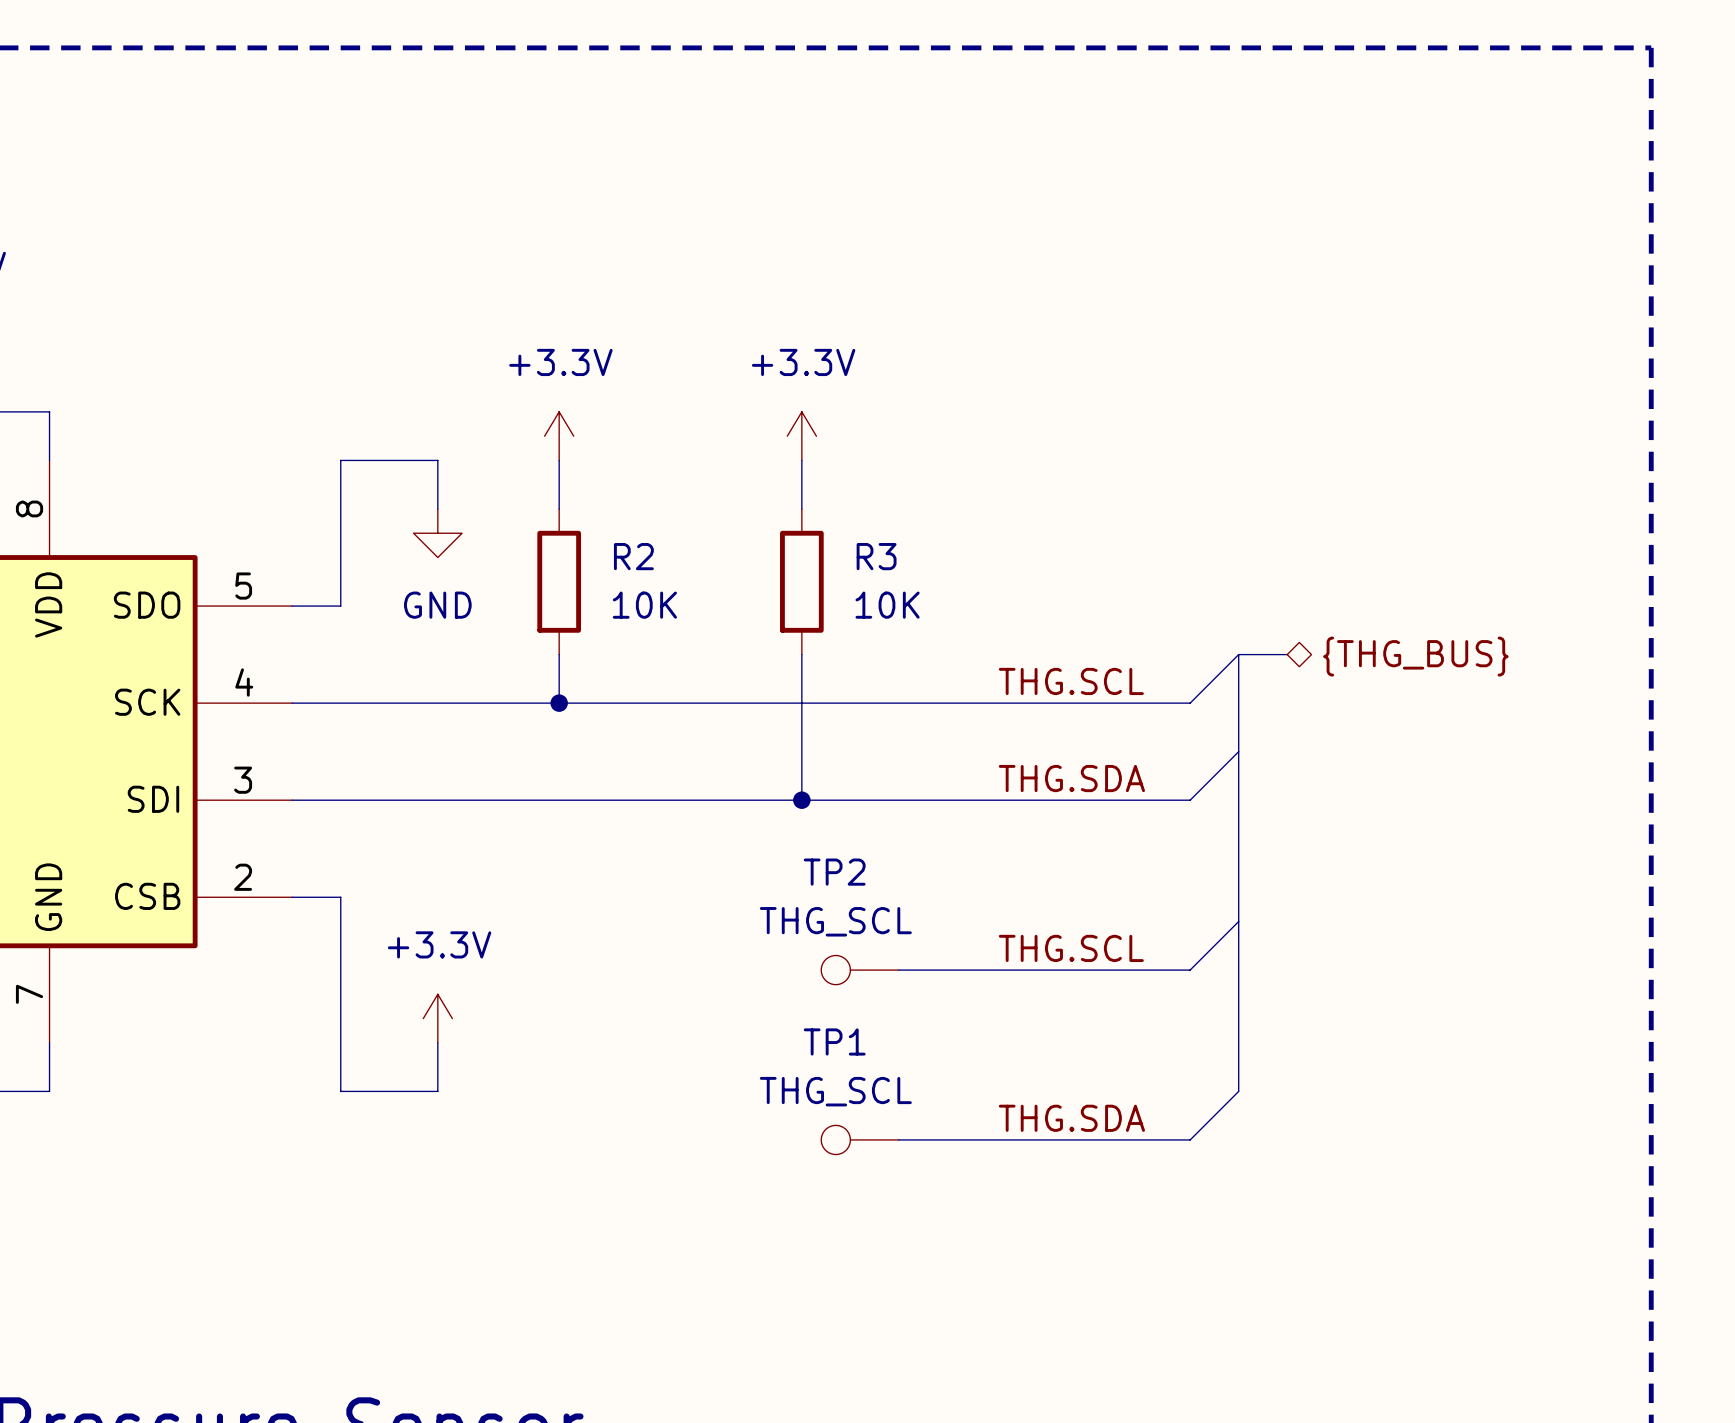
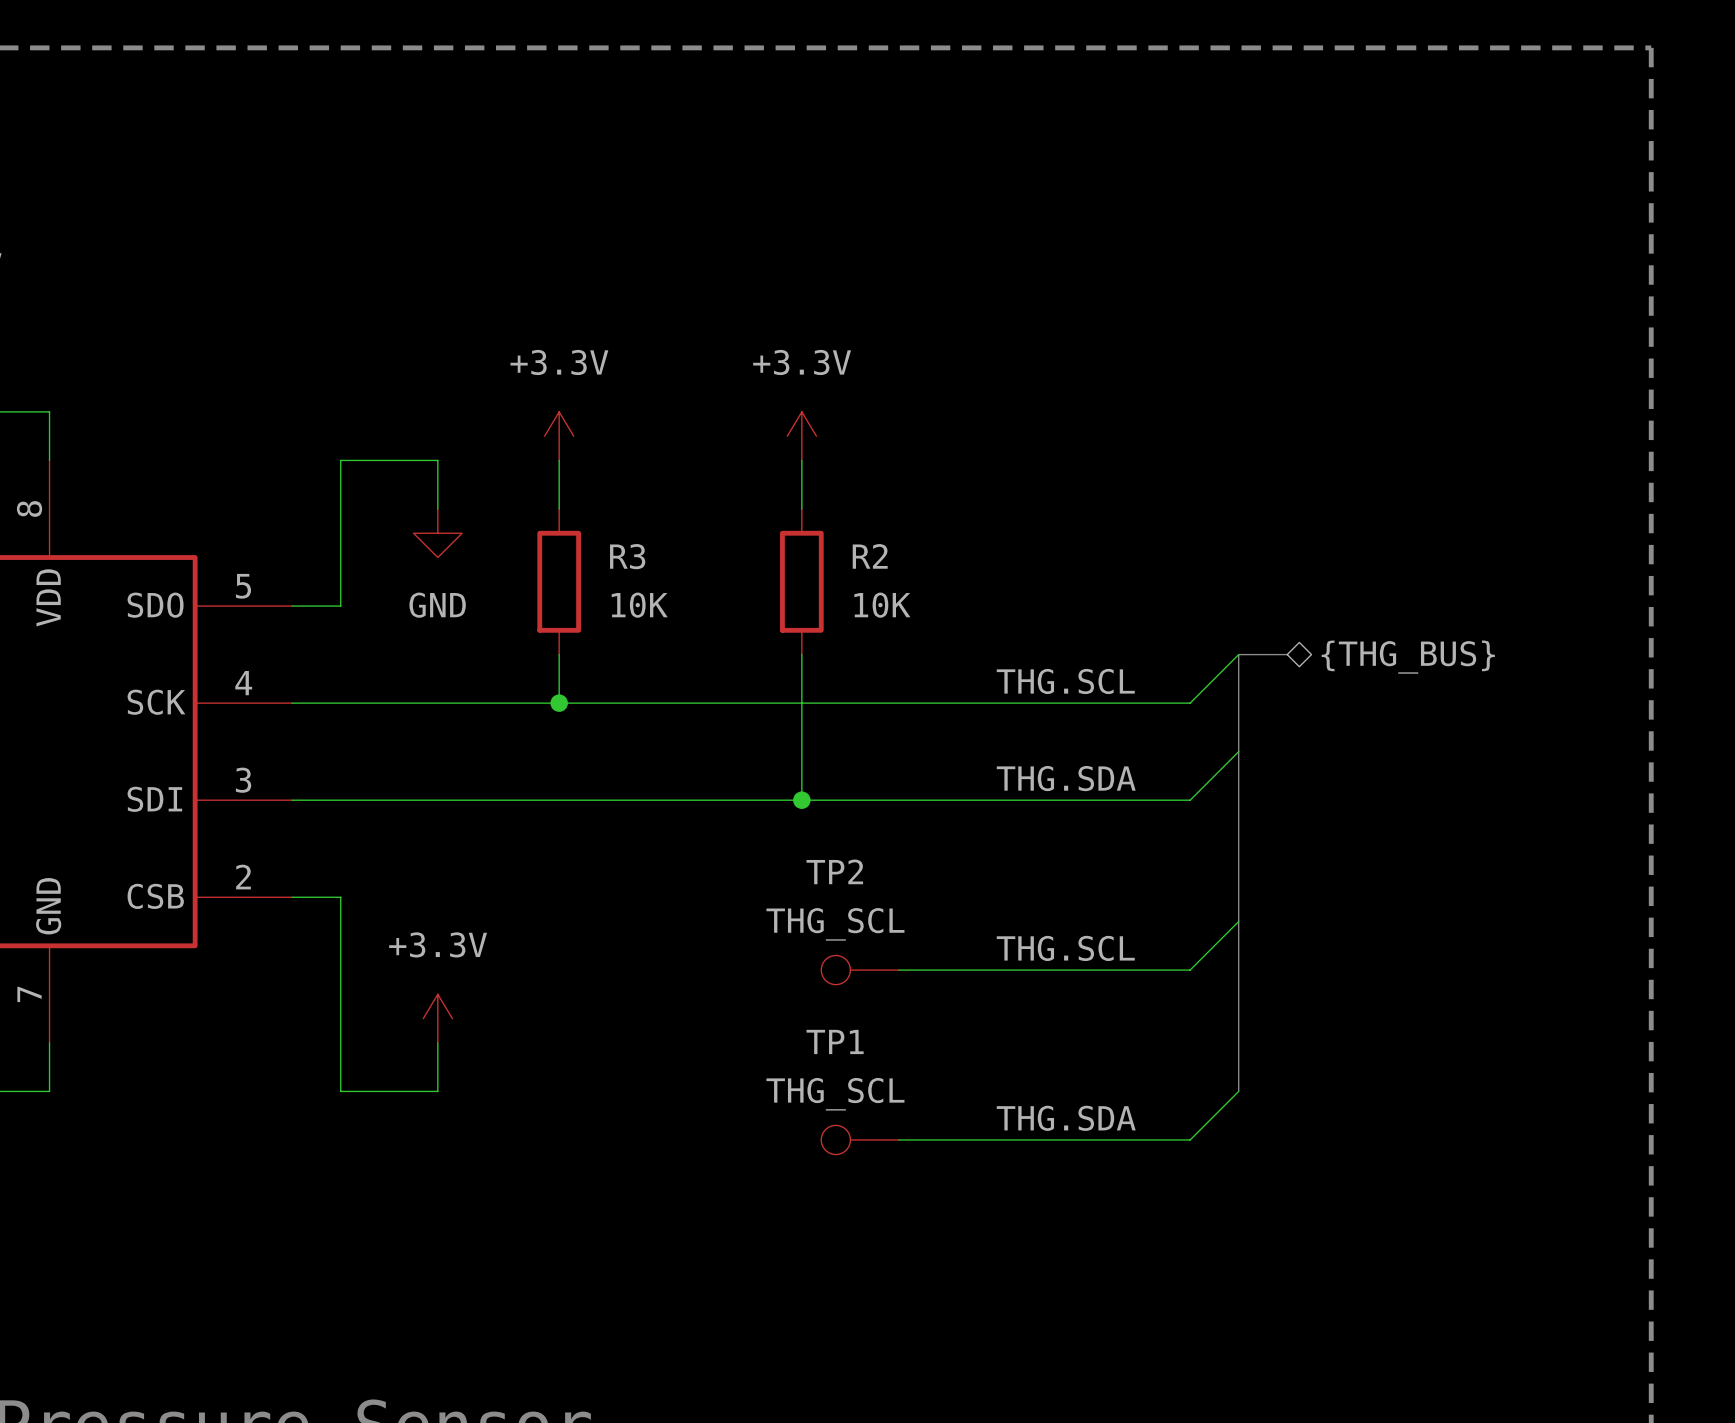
R2 name: R2 (633, 556) -> R3 (627, 556)
R3 name: R3 (876, 556) -> R2 (870, 556)

